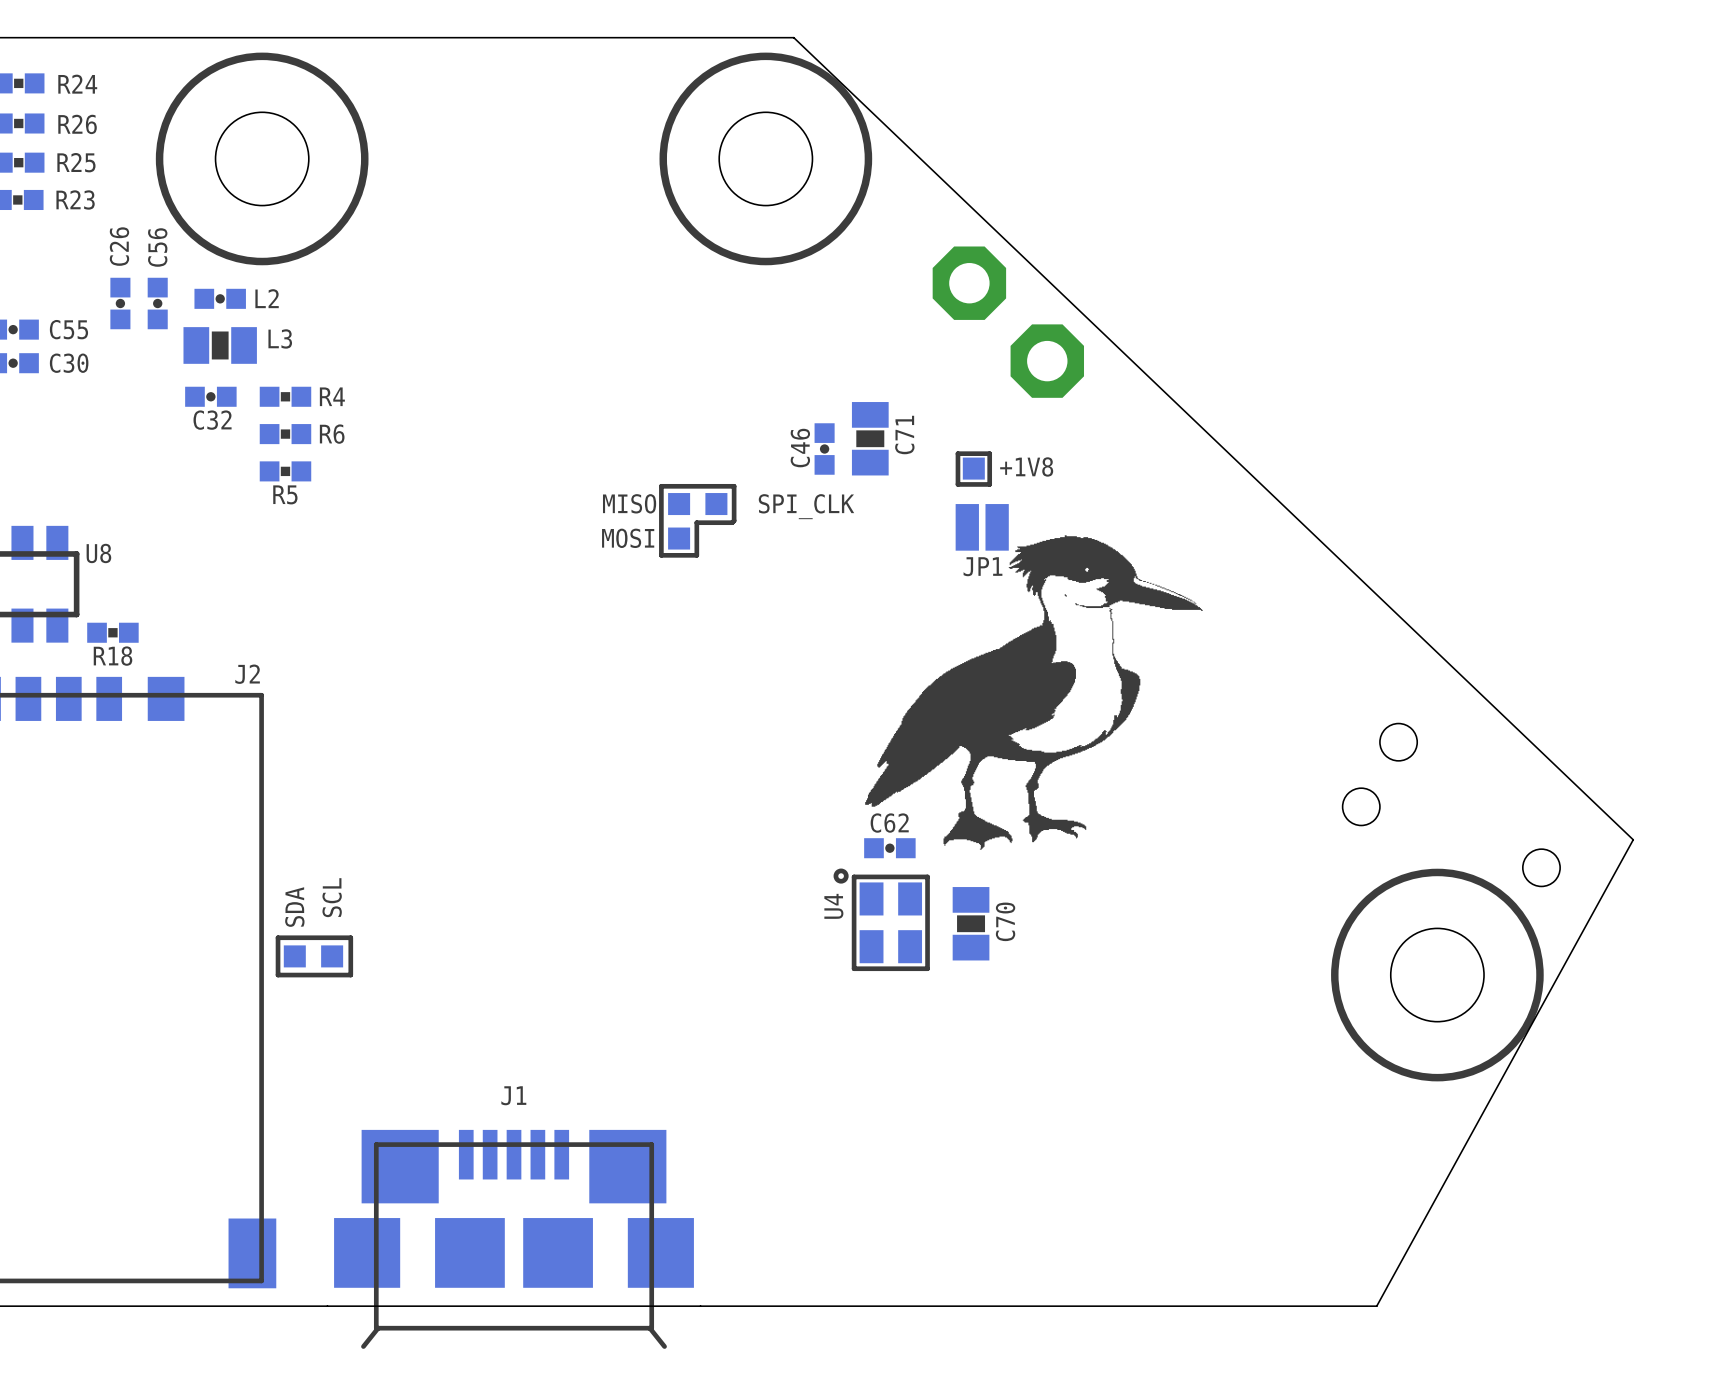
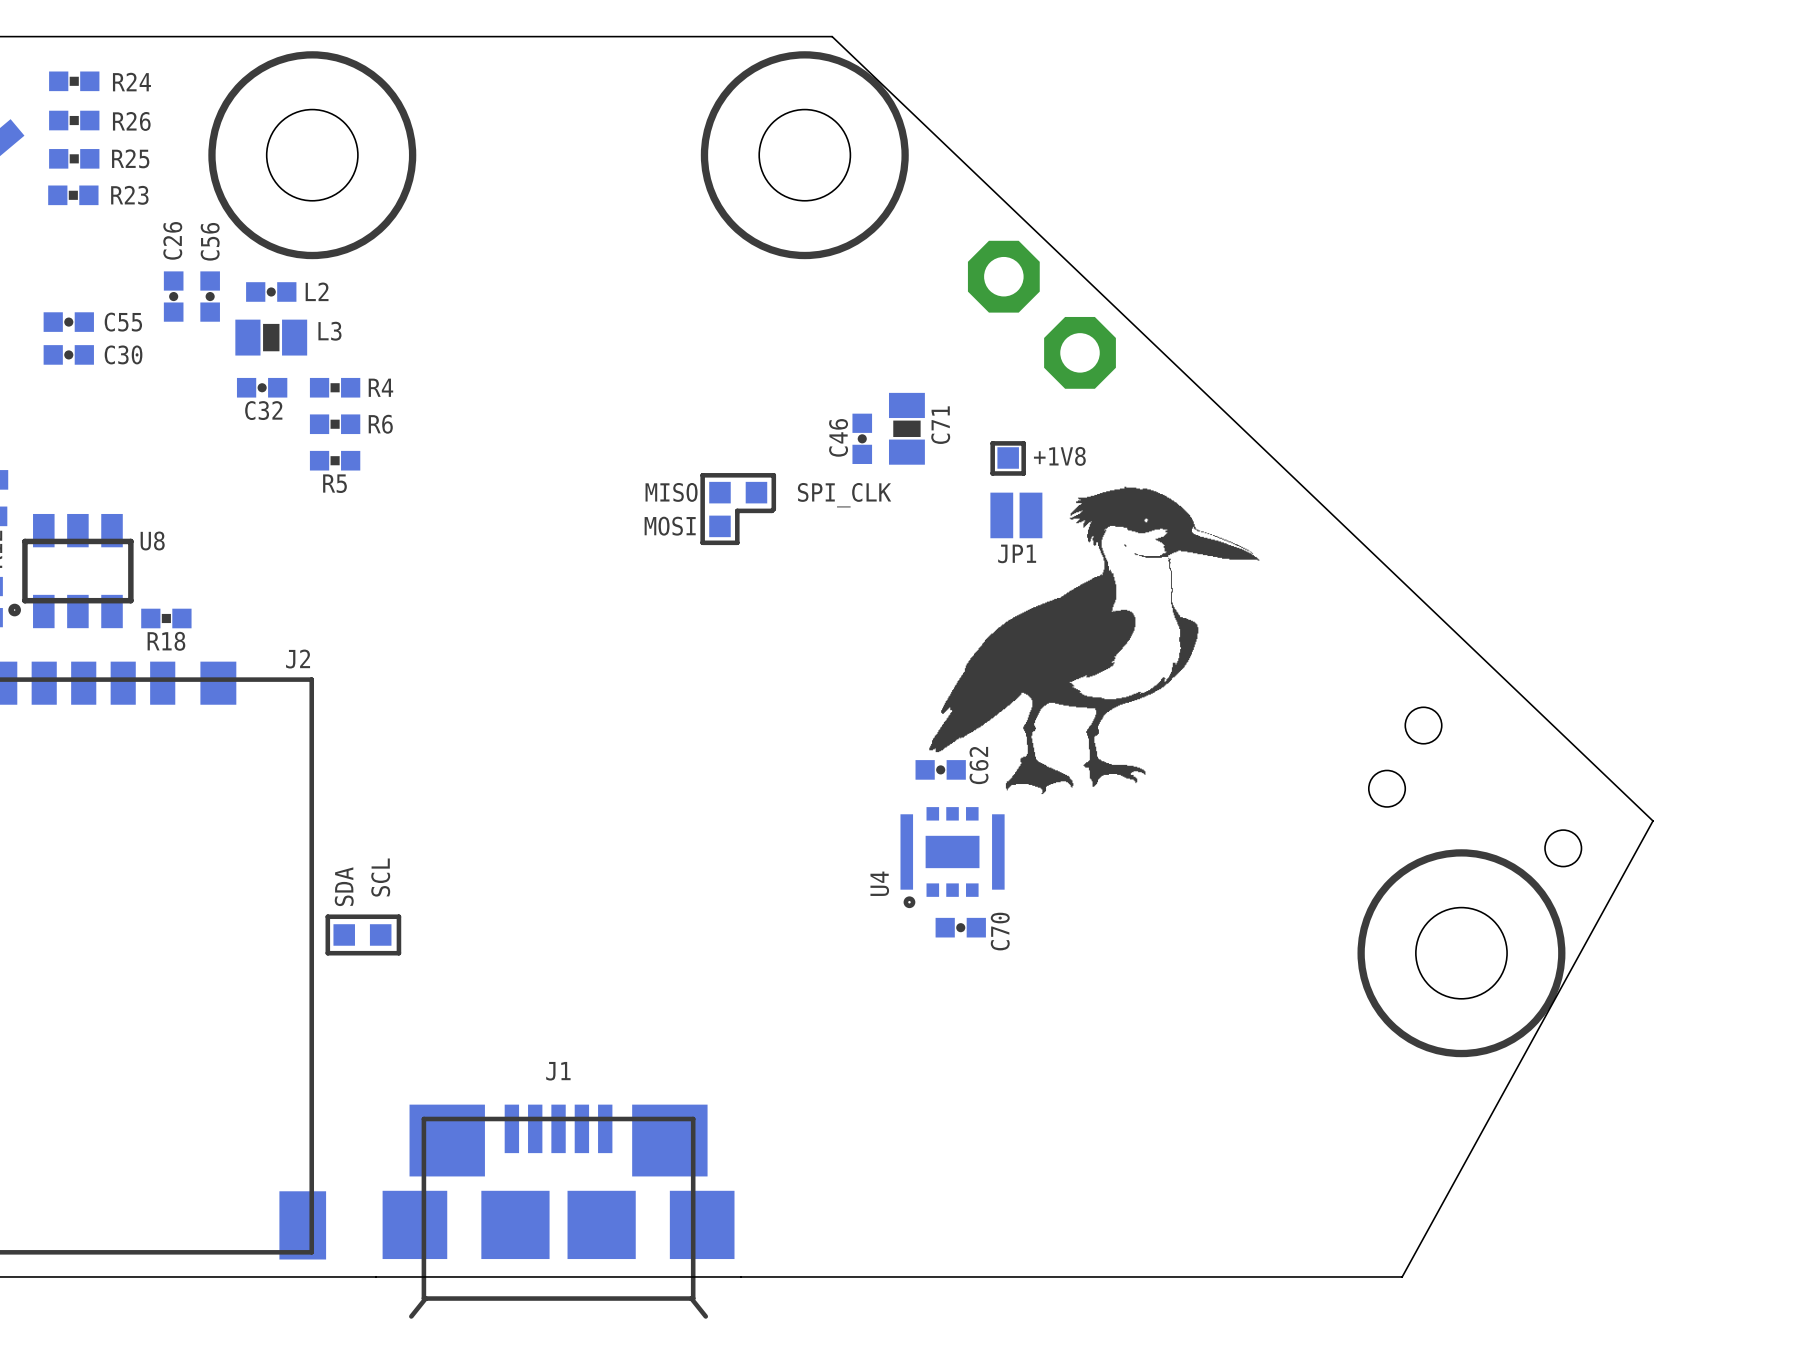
drawing position: (1033, 692) -> (1094, 640)
C62 name rotation: 0° (889, 823) -> 90° counterclockwise (979, 765)
C62 position: (889, 848) -> (940, 769)
U4 footprint: [833, 868, 930, 972] -> [900, 807, 1005, 909]
C70 footprint: [952, 887, 990, 961] -> [935, 917, 986, 938]

